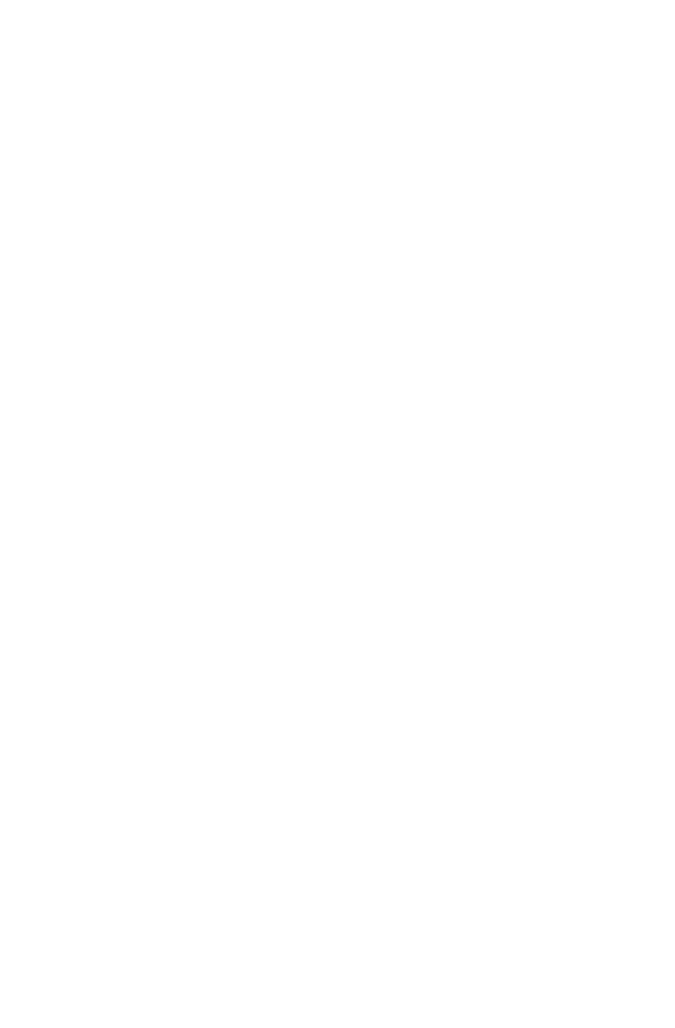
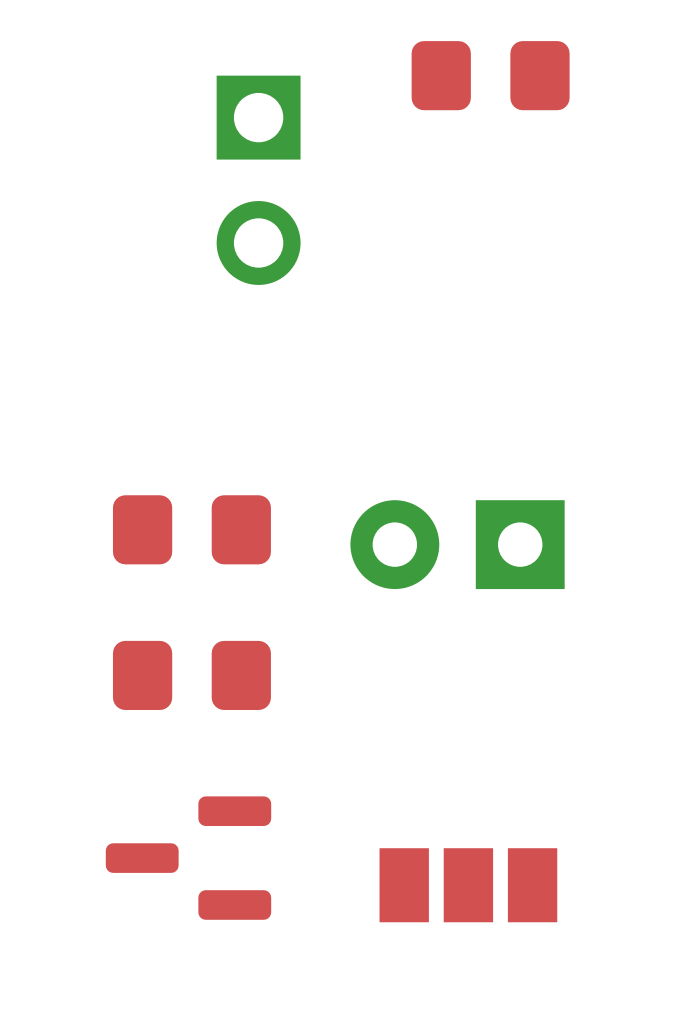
part: none -> (490, 75)
part: none -> (258, 180)
part: none -> (191, 529)
part: none -> (457, 544)
part: none -> (191, 675)
part: none -> (188, 858)
part: none -> (468, 885)

